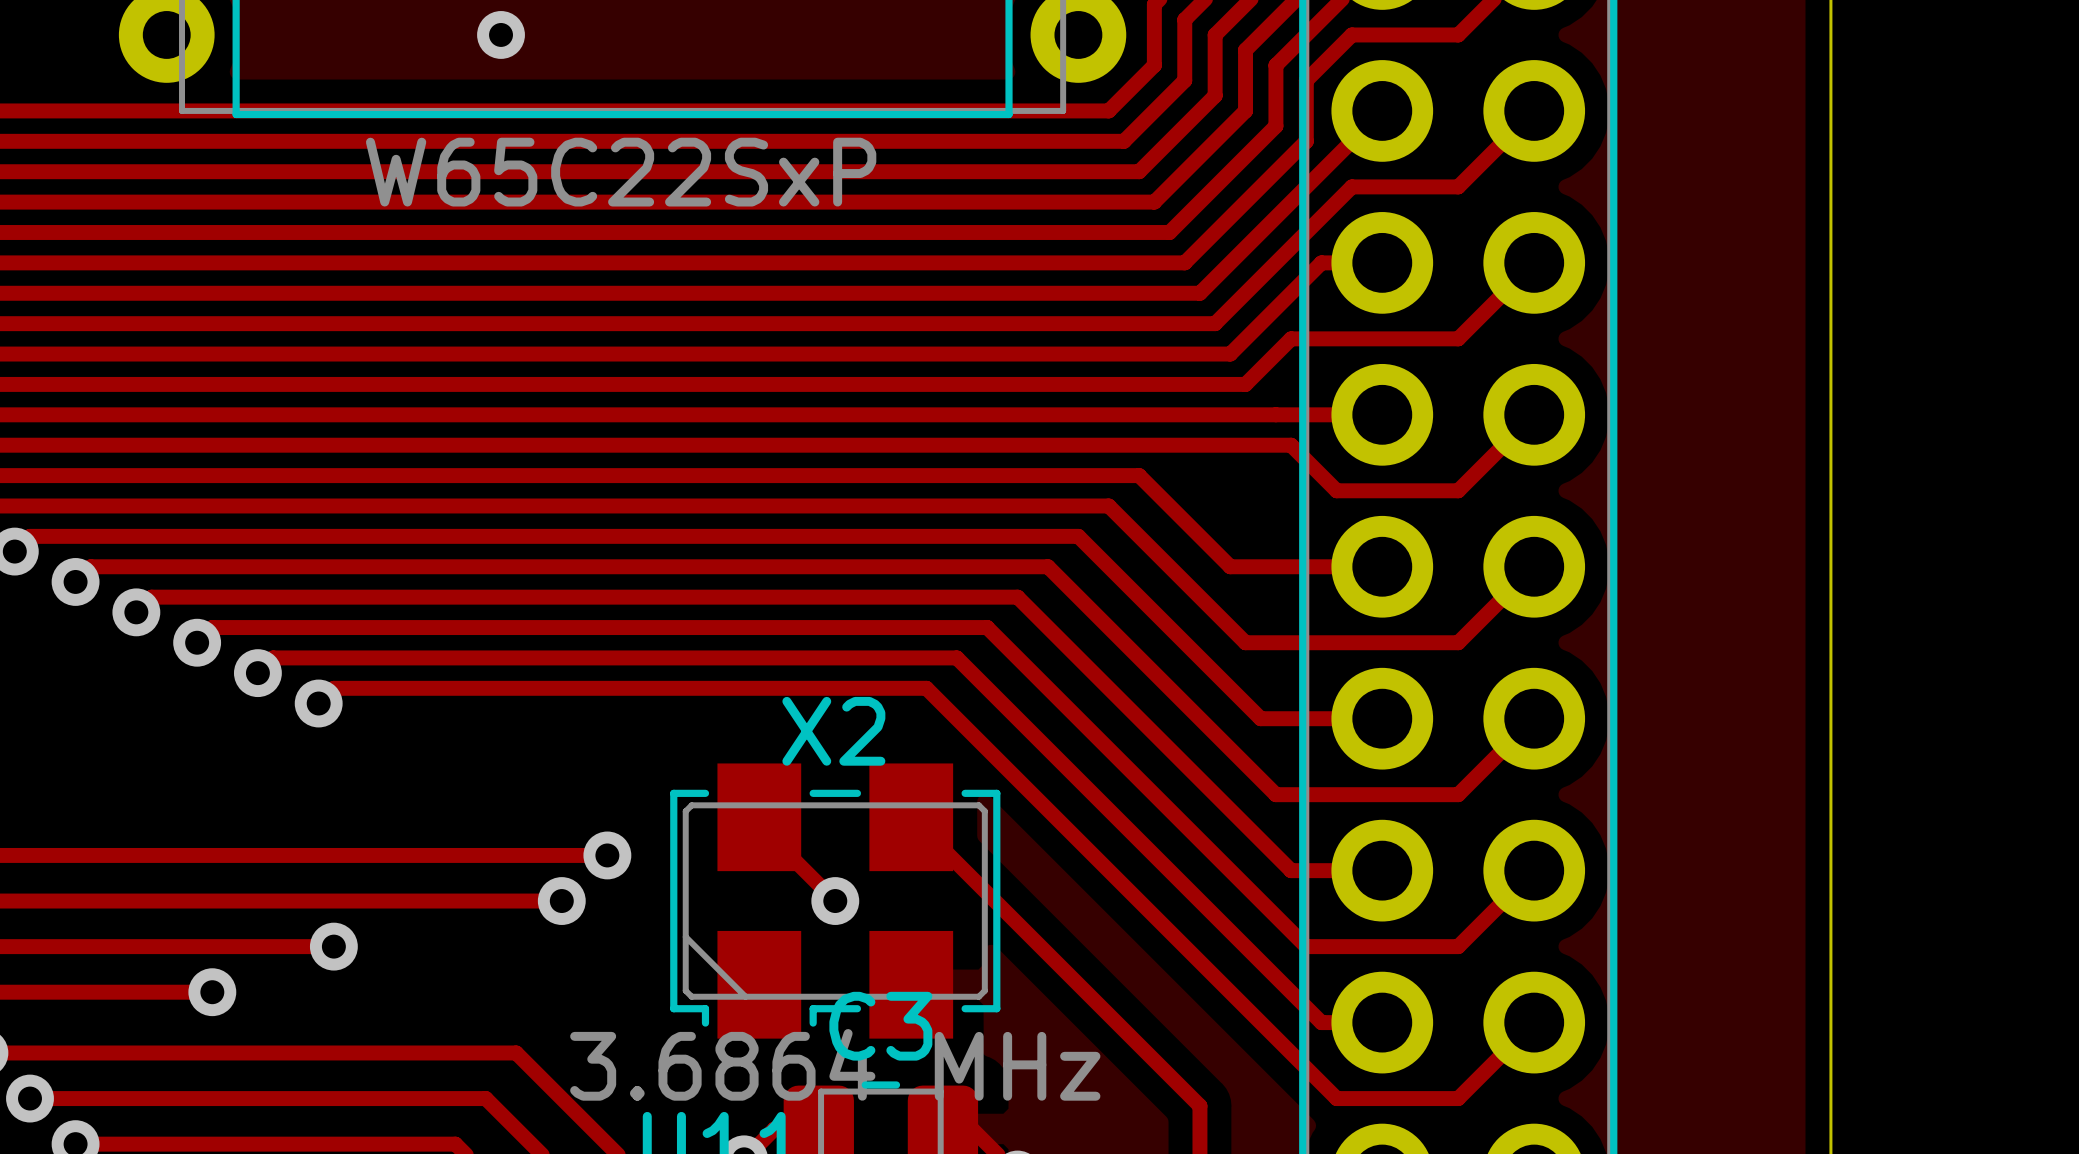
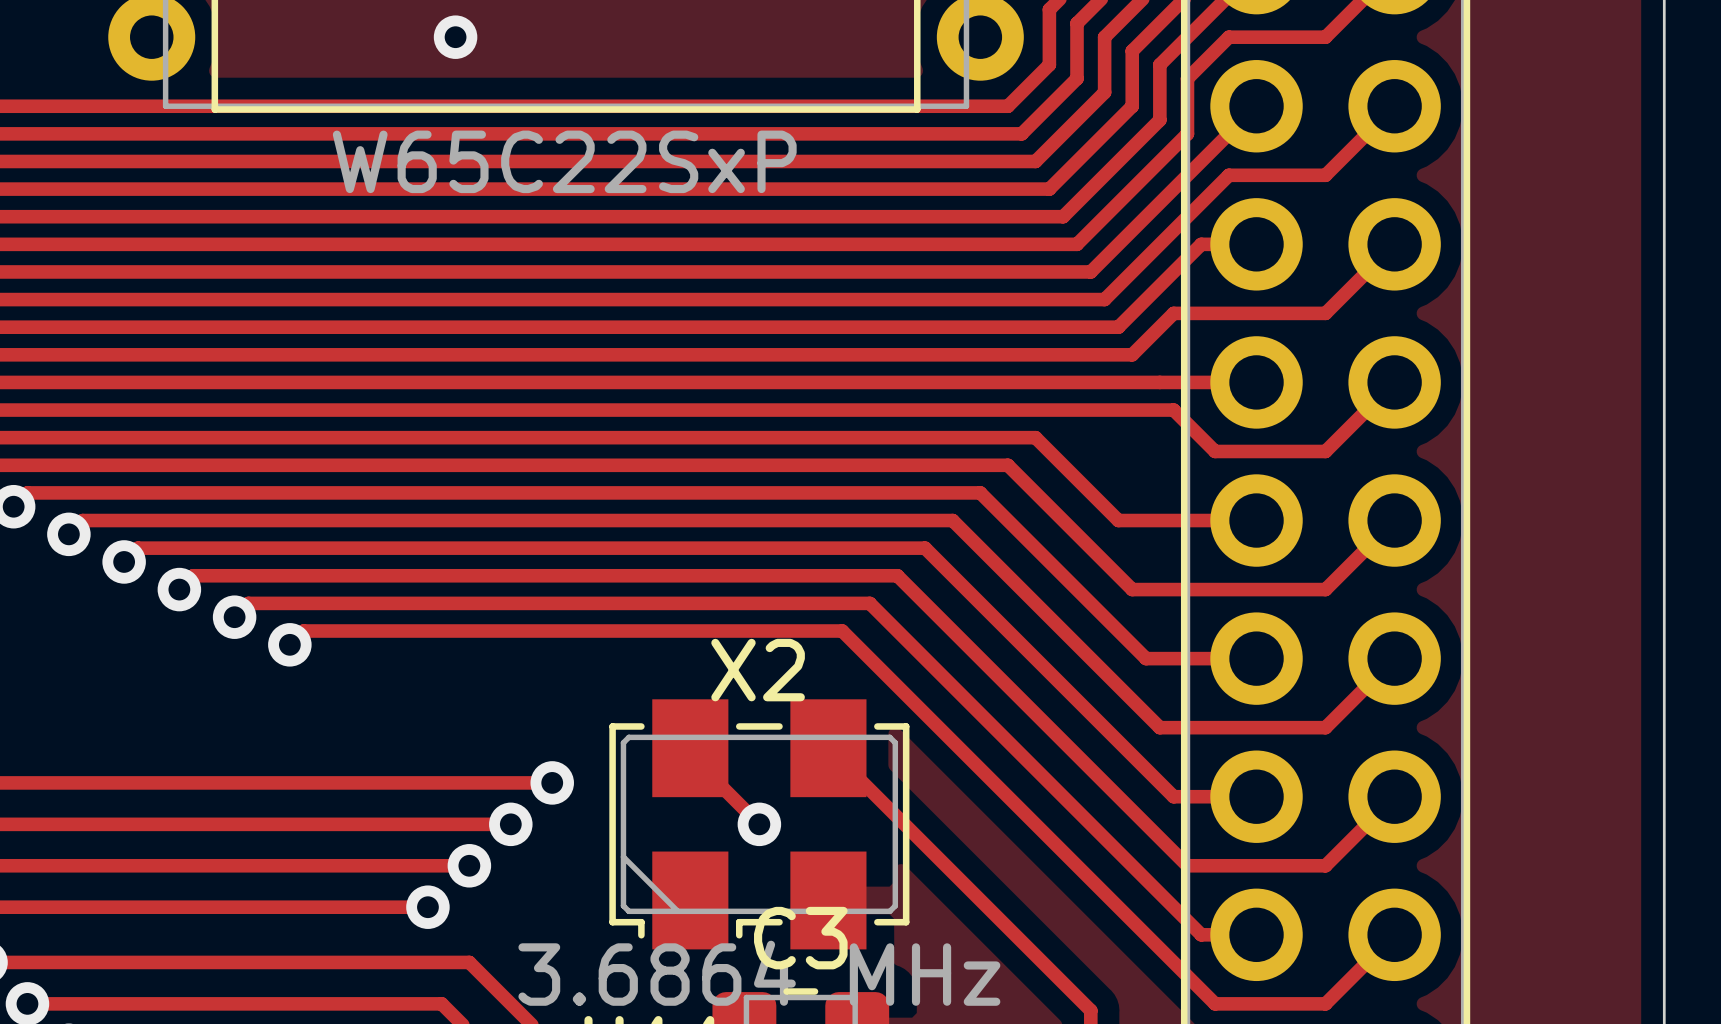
track: none -> (303, 865) (469, 865)
via: (333, 946) -> none
via: none -> (469, 865)
track: none -> (193, 907) (427, 907)
via: (212, 992) -> none
via: none -> (427, 907)

